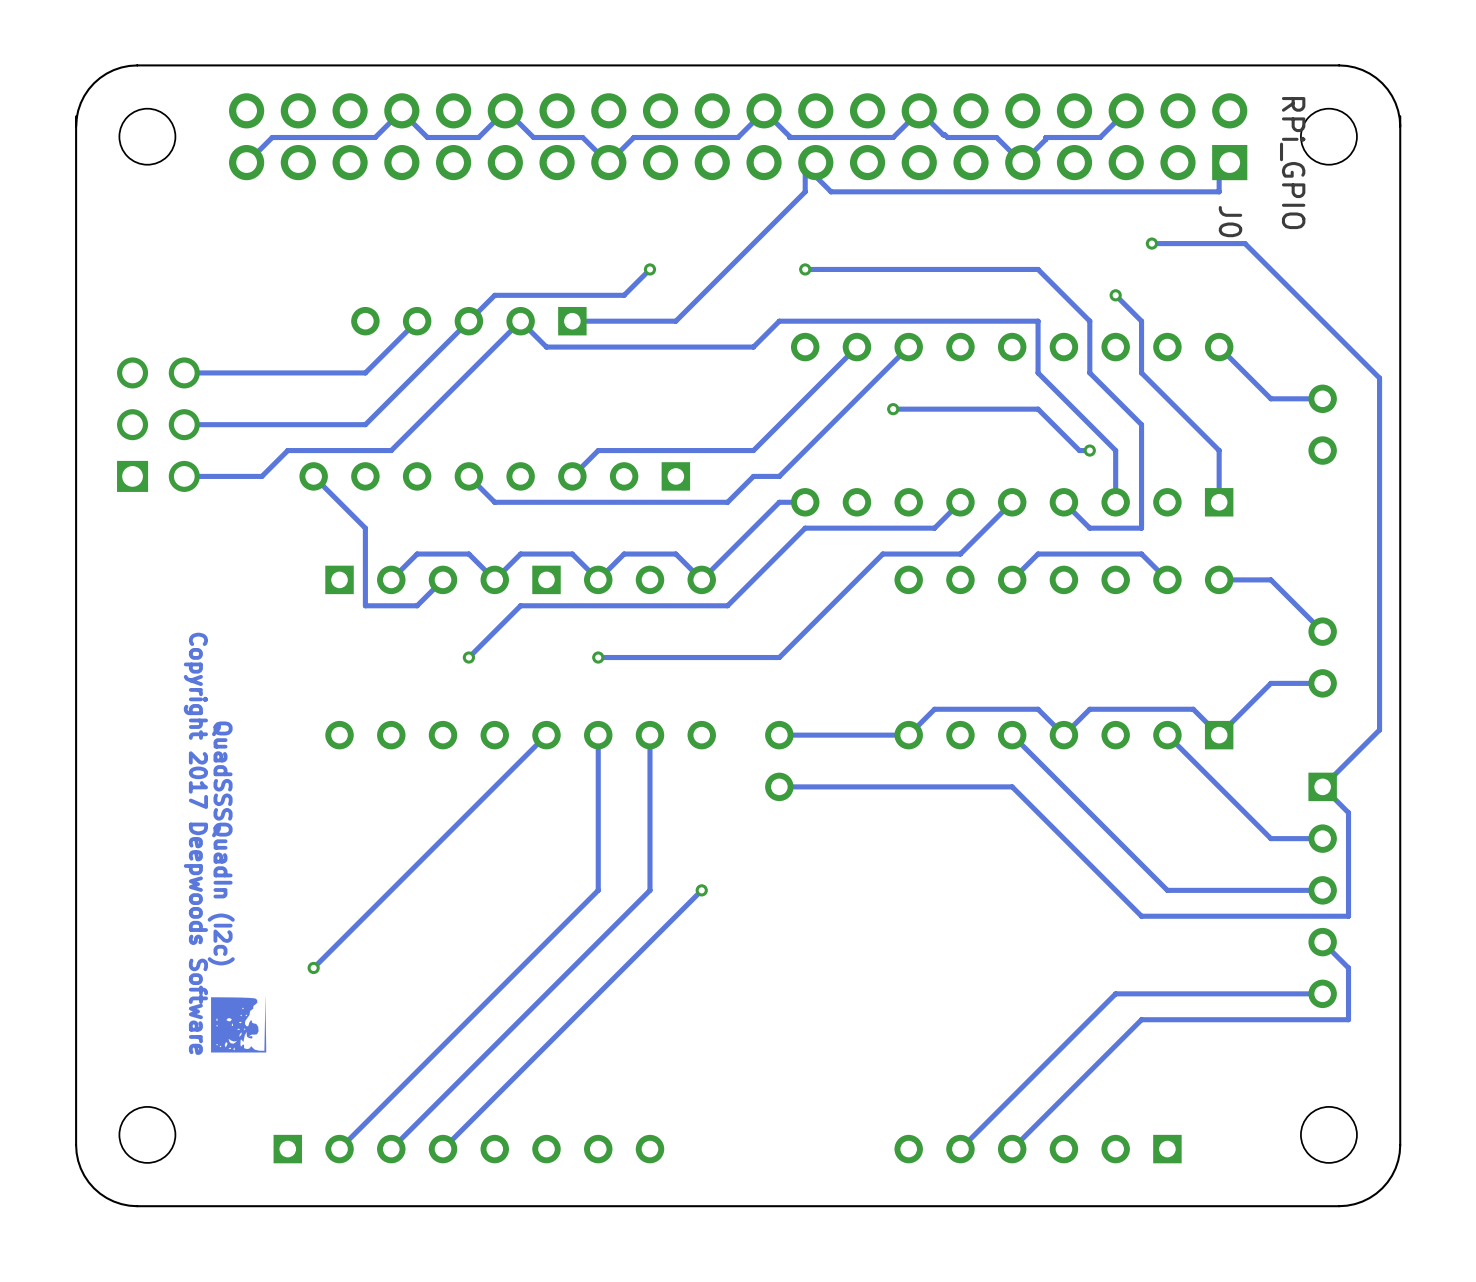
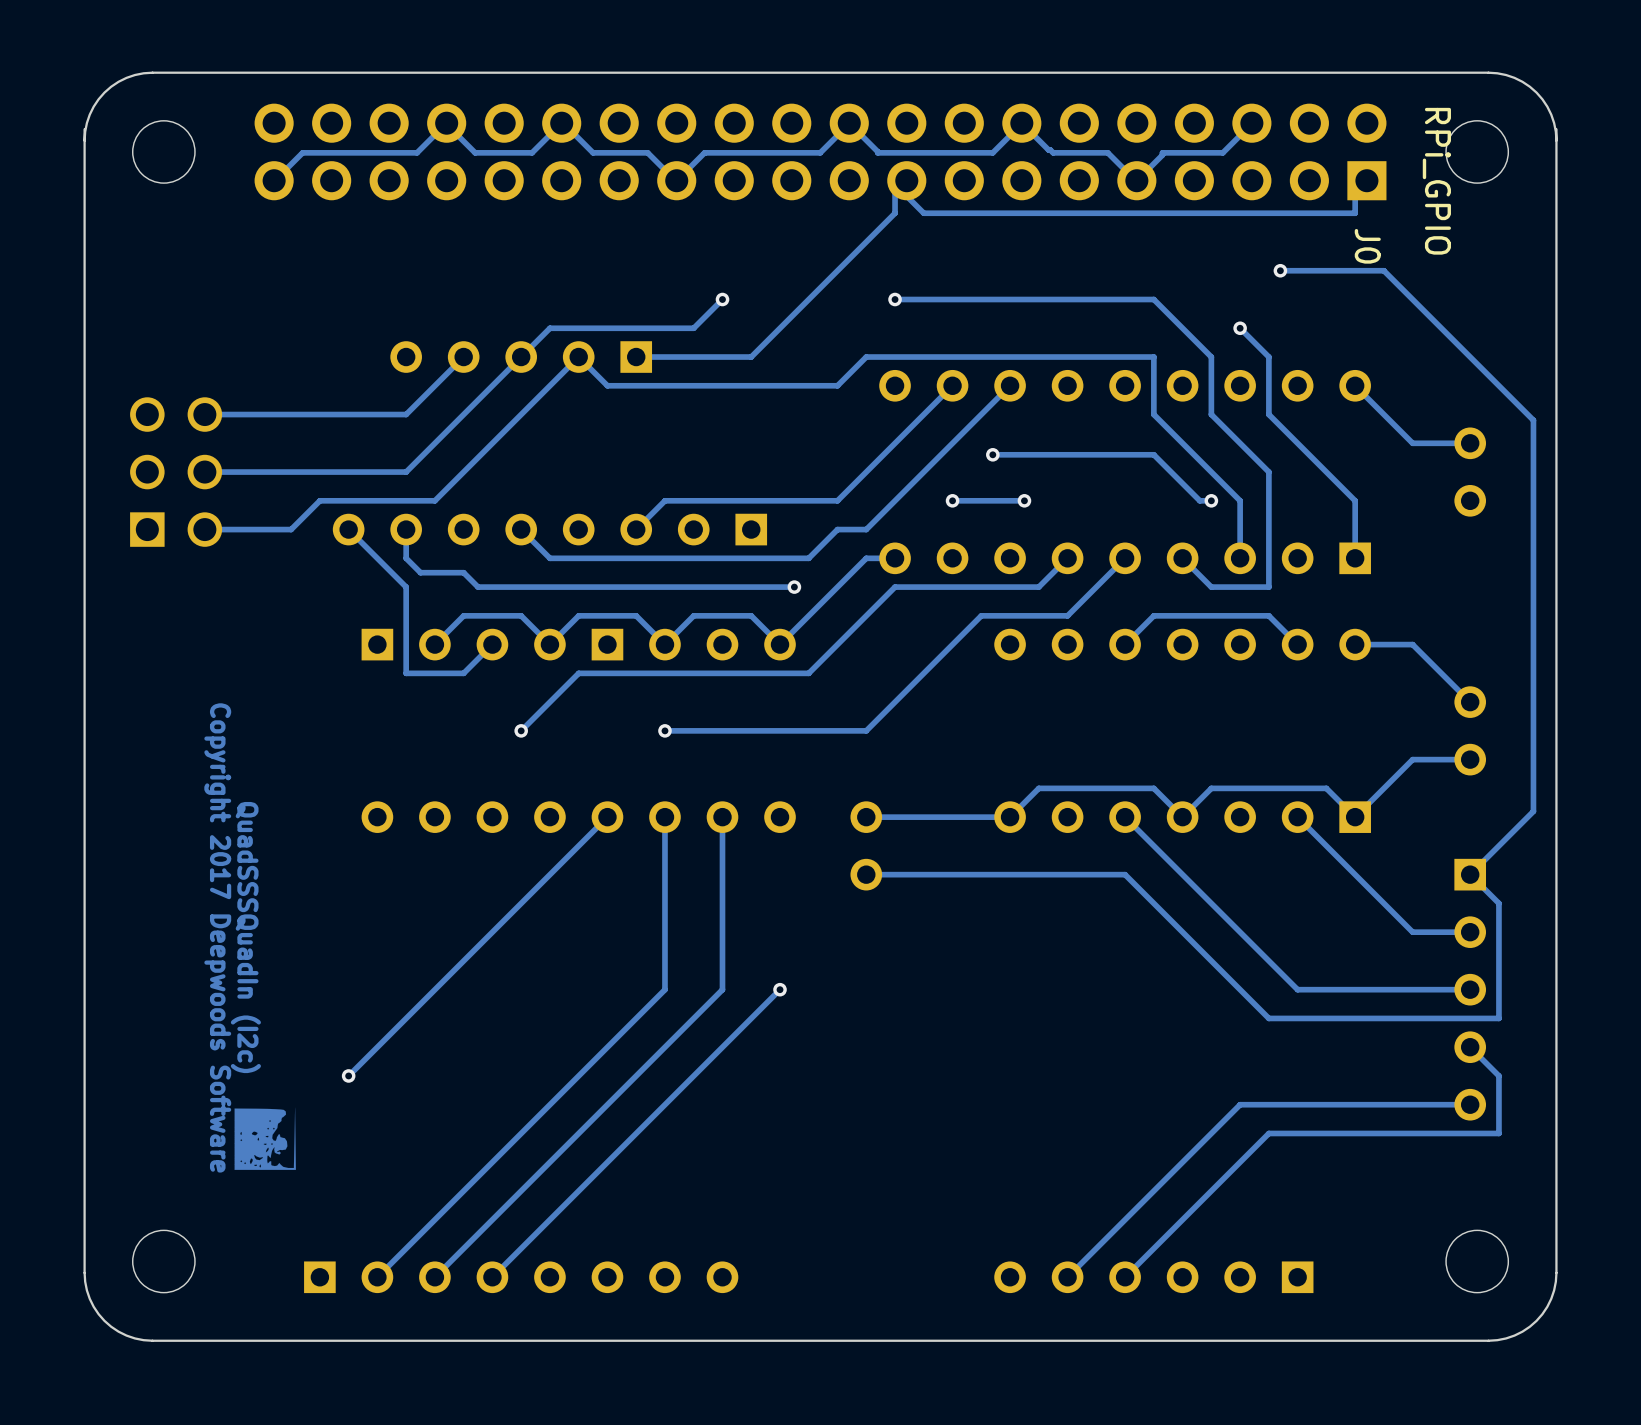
via: none -> (952, 500)
track: none -> (1024, 500) (952, 500)
via: none -> (1024, 500)
track: none -> (406, 529) (406, 558) (420, 572) (463, 572) (478, 587) (794, 587)
via: none -> (794, 587)

